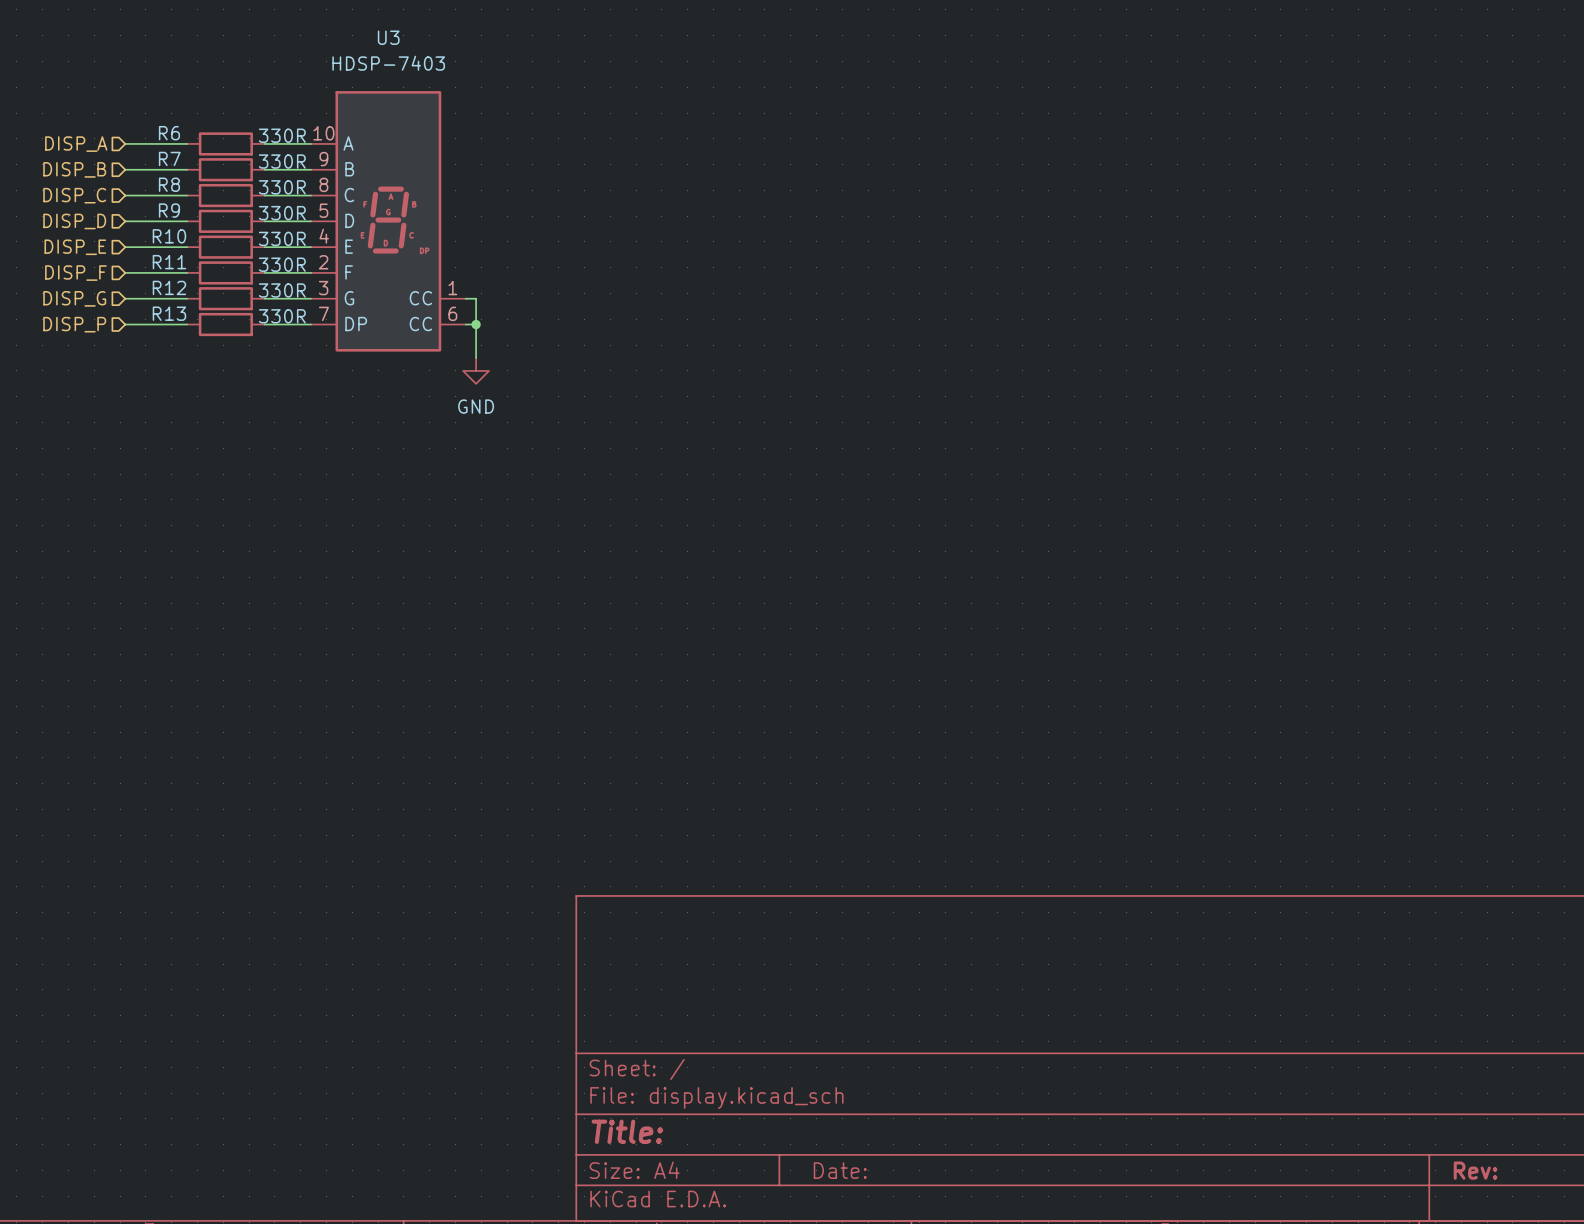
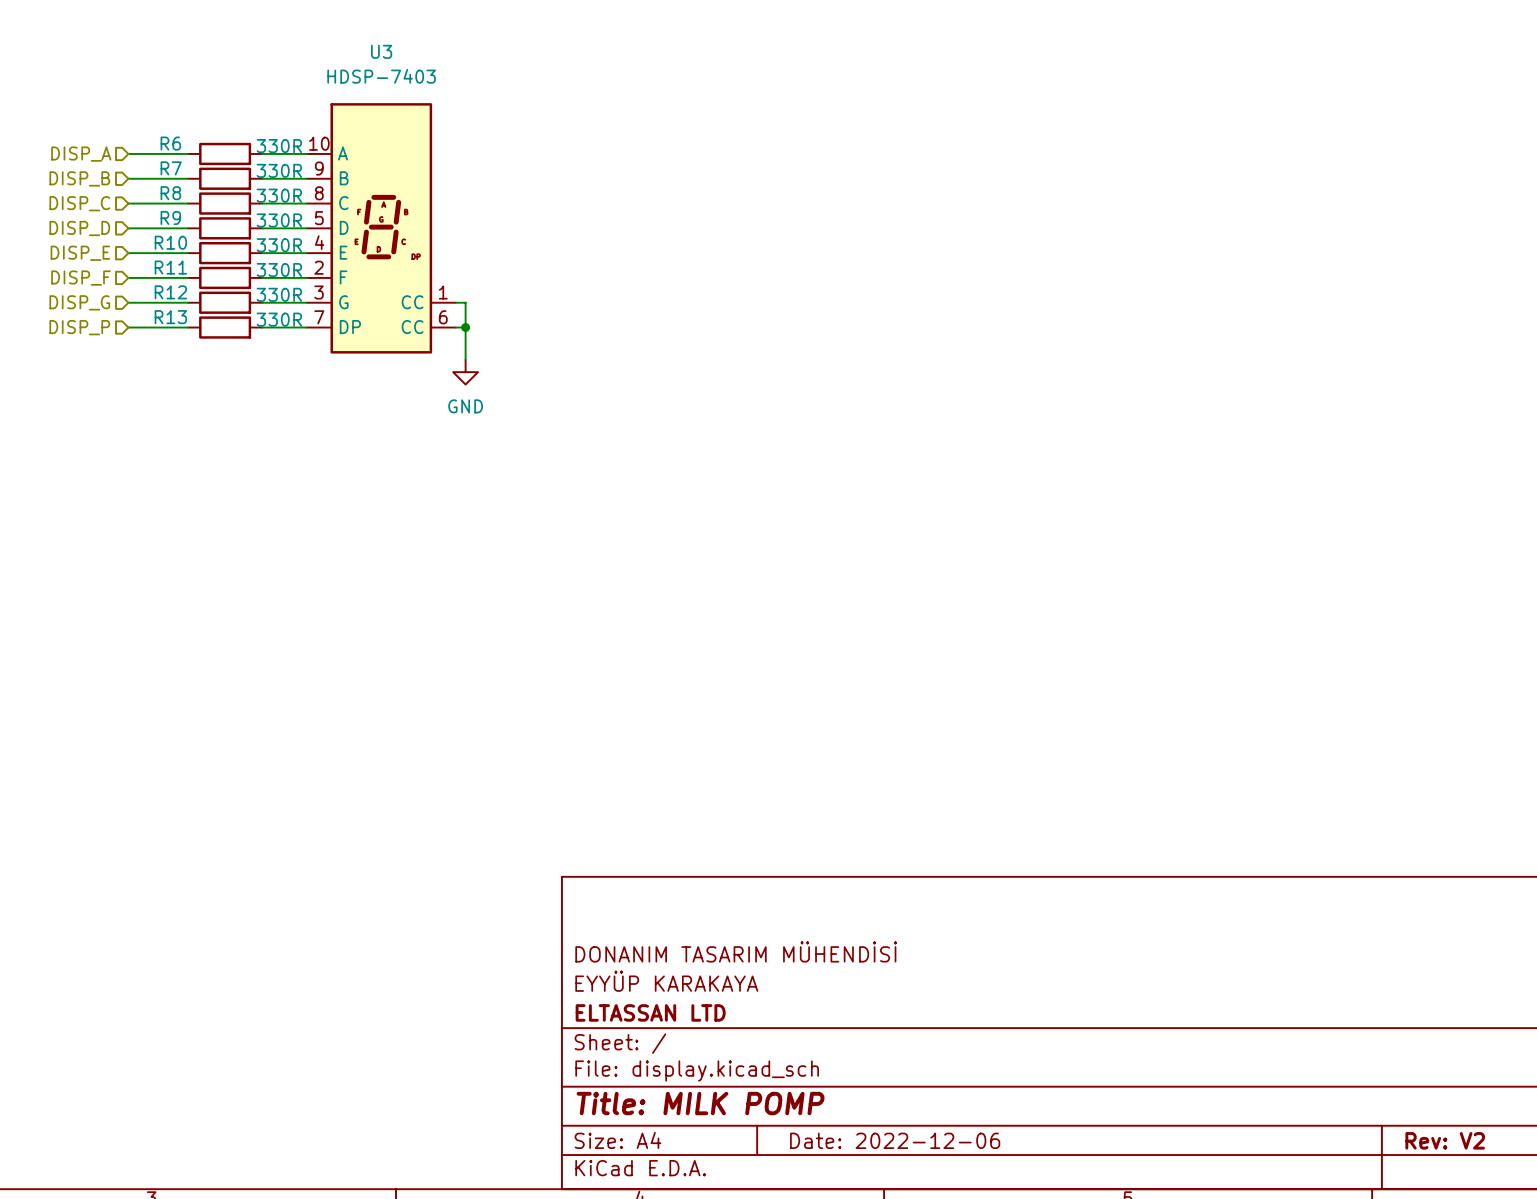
title block: none -> DONANIM TASARIM MÜHENDİSİ (736, 951)
title block: none -> EYYÜP KARAKAYA (666, 981)
title block: none -> ELTASSAN LTD (650, 1012)
title block: Title: (627, 1131) -> Title: MILK POMP (700, 1103)
title block: Date: (840, 1170) -> Date: 2022-12-06 (895, 1140)
title block: Rev: (1475, 1170) -> Rev: V2 (1445, 1140)

